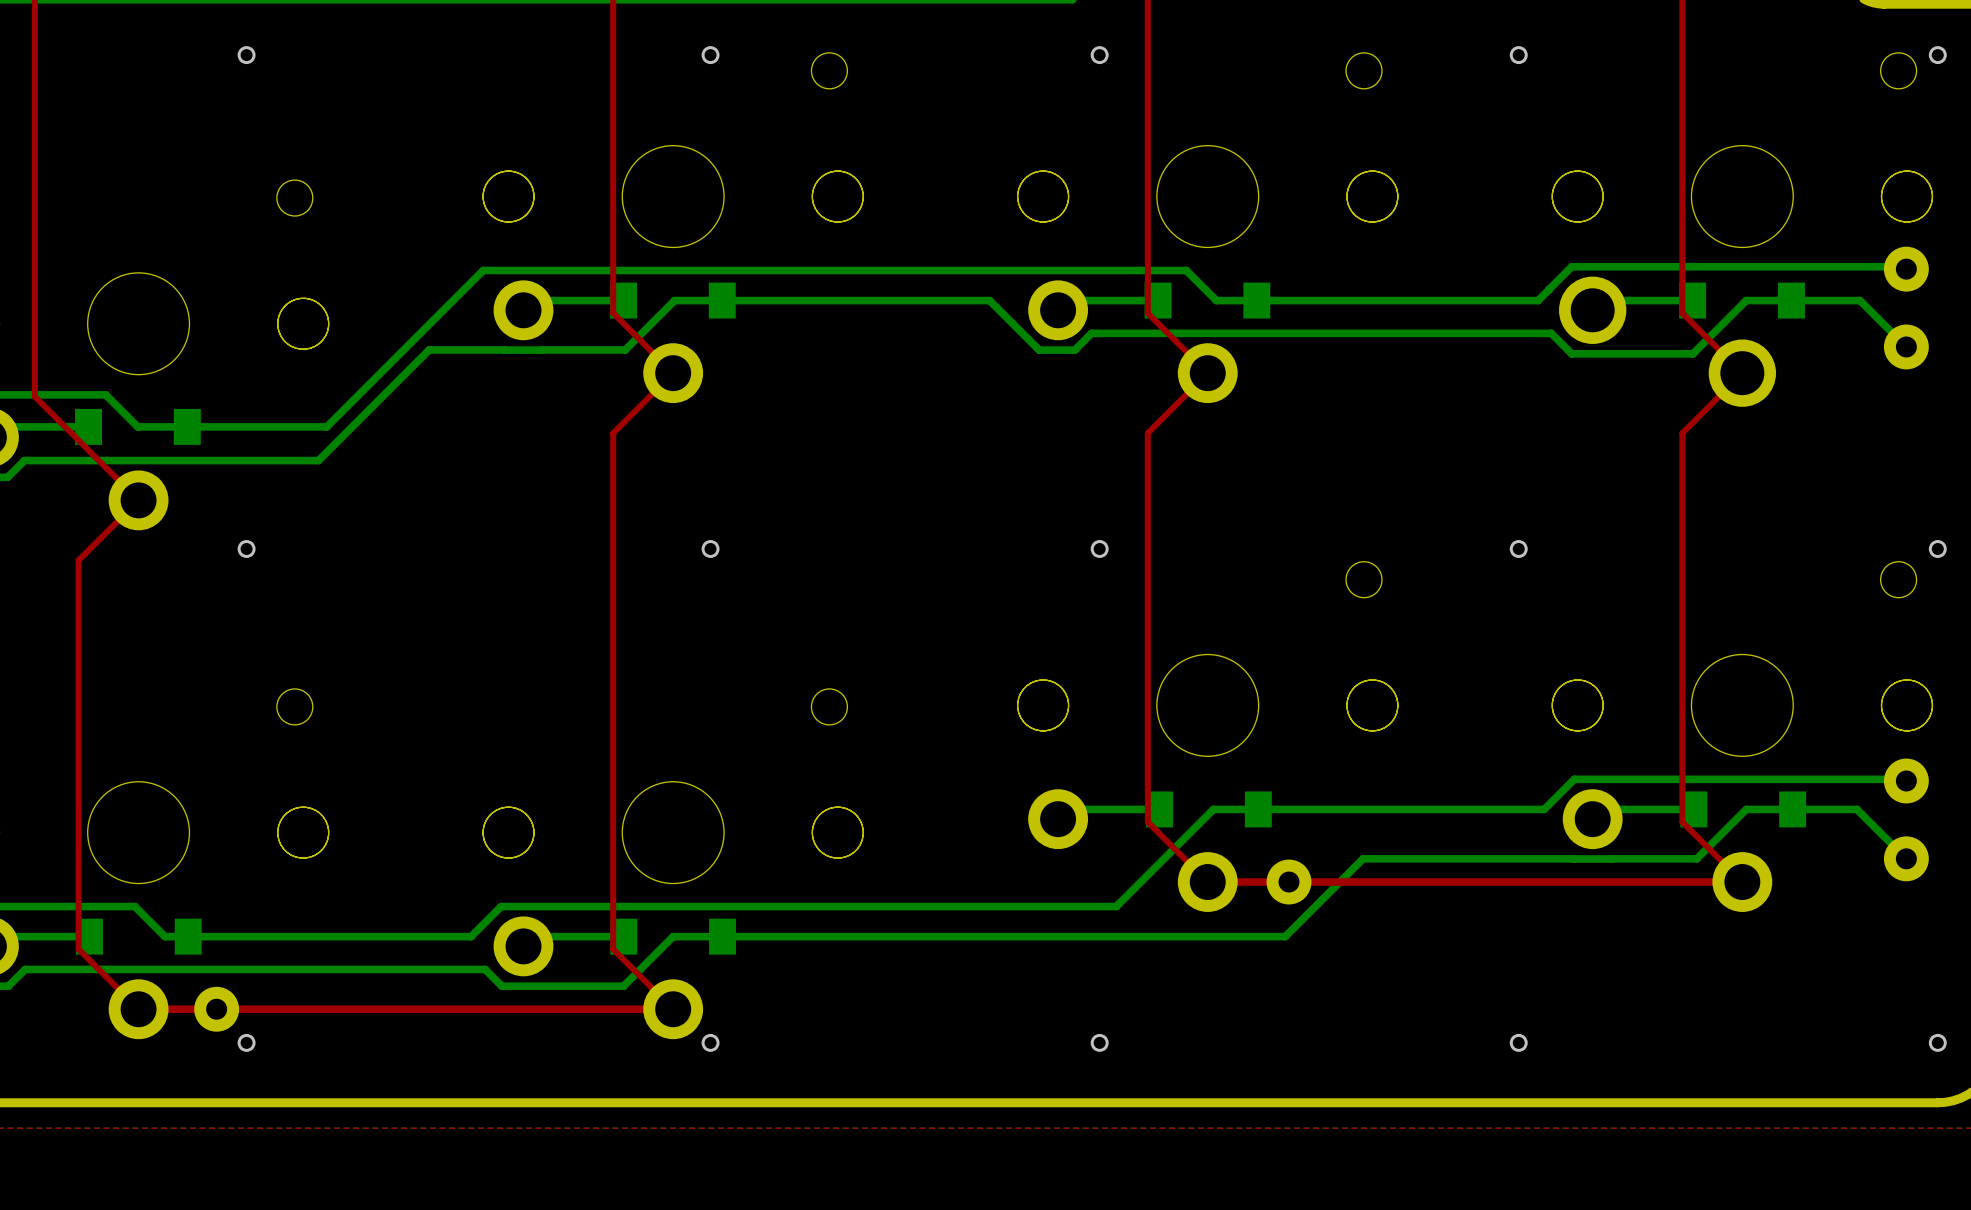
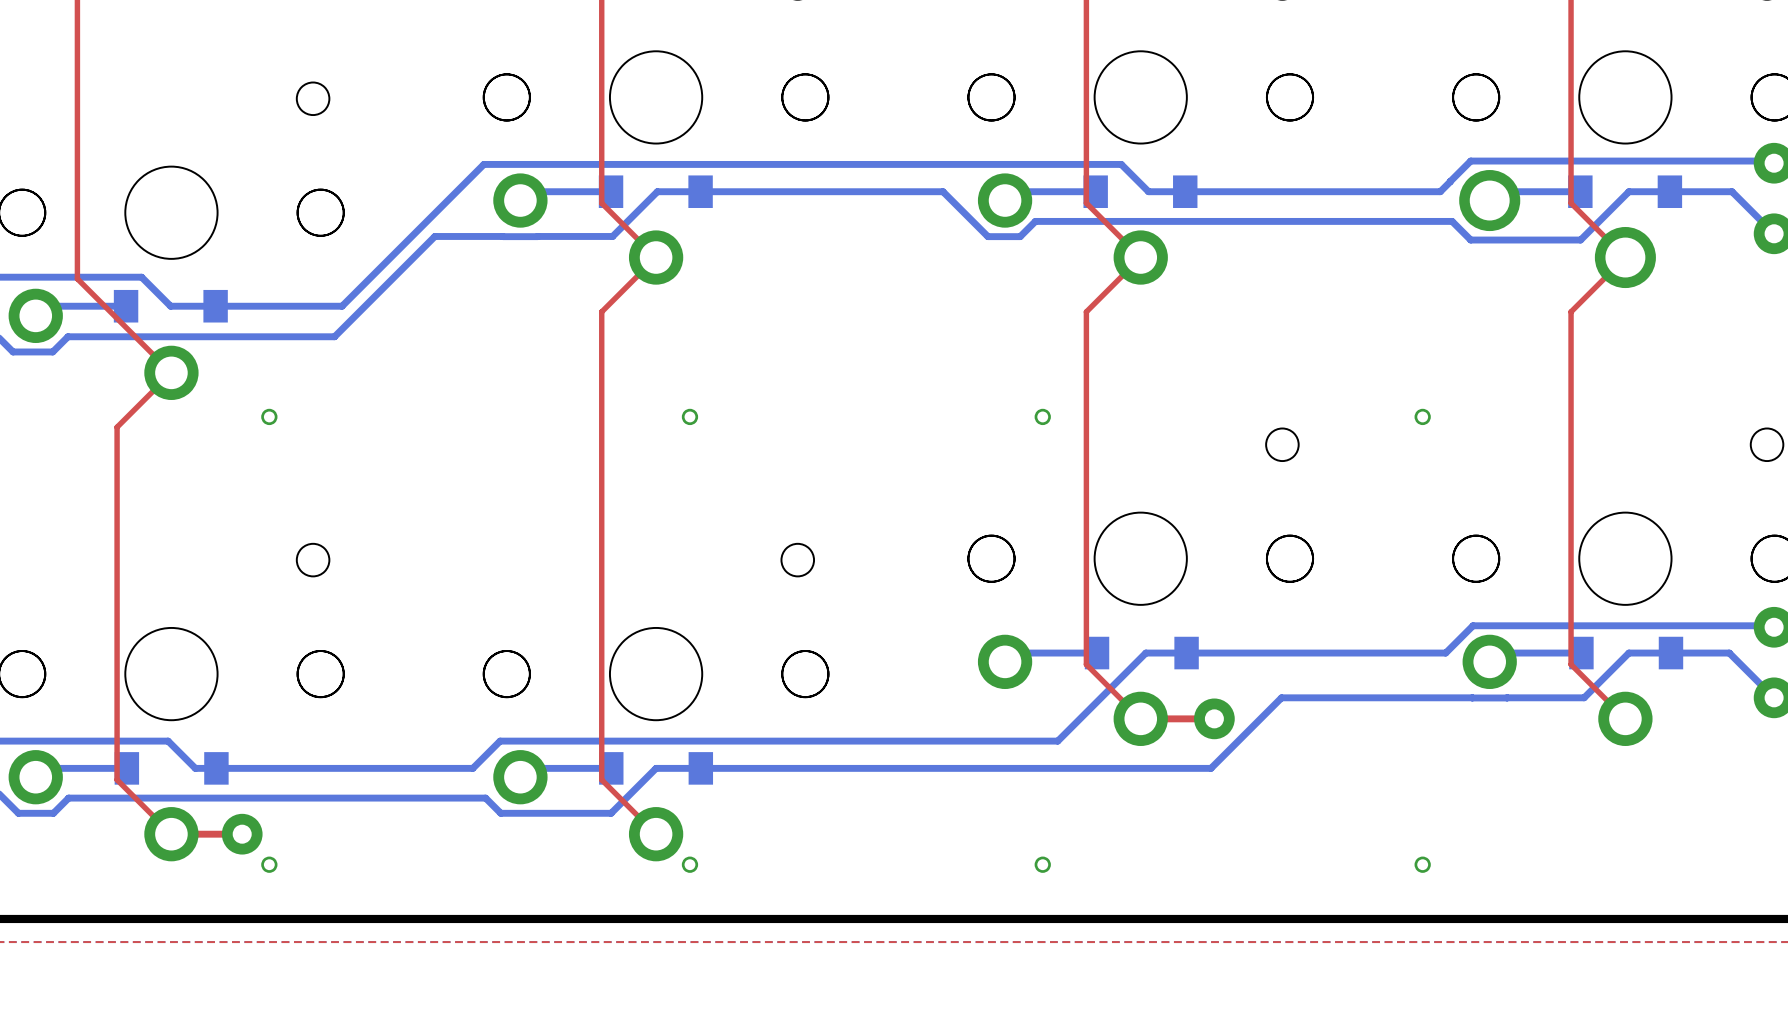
top track: (1289, 882) (1742, 882) -> none
top track: (216, 1009) (673, 1009) -> none

